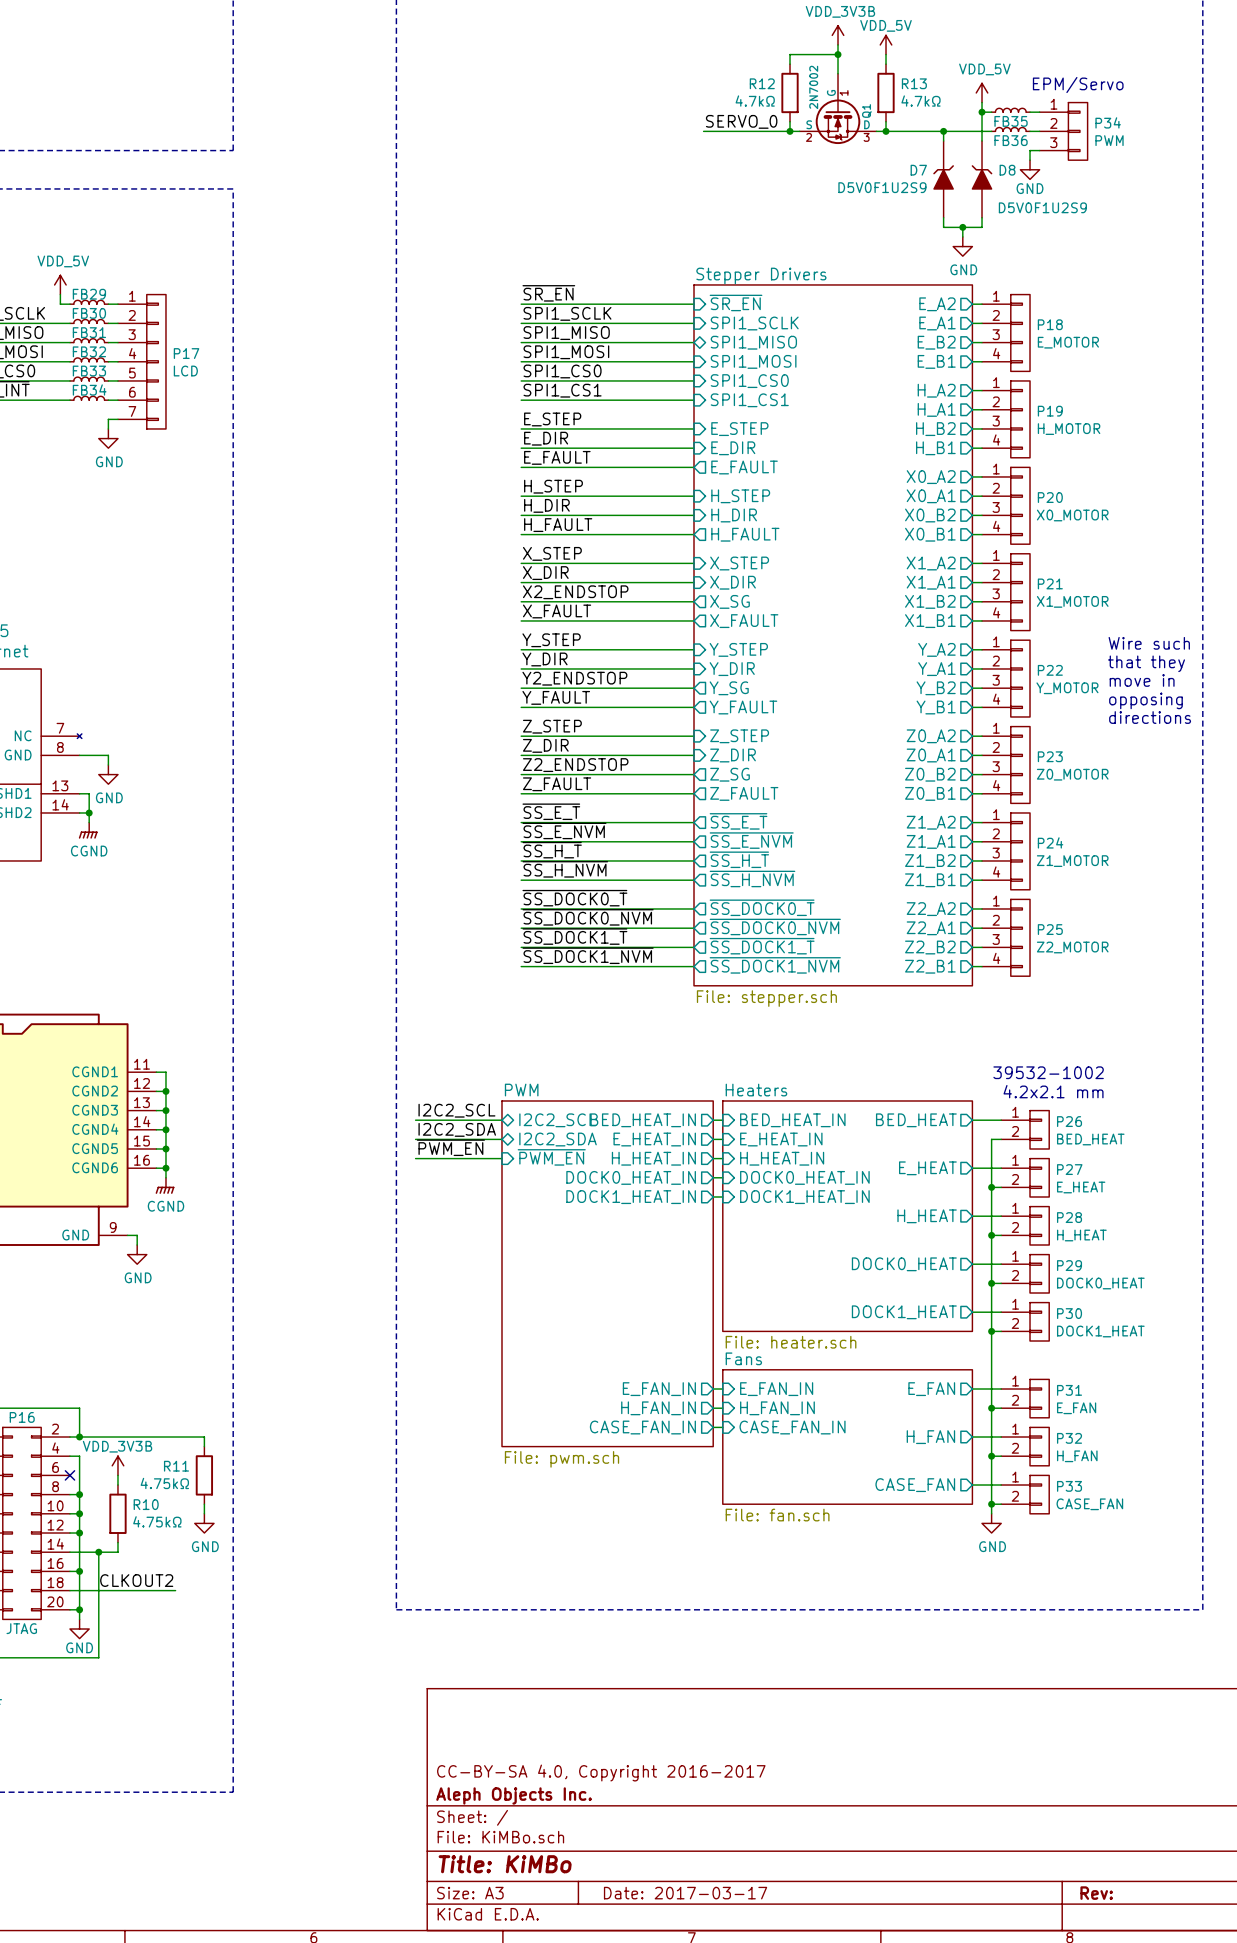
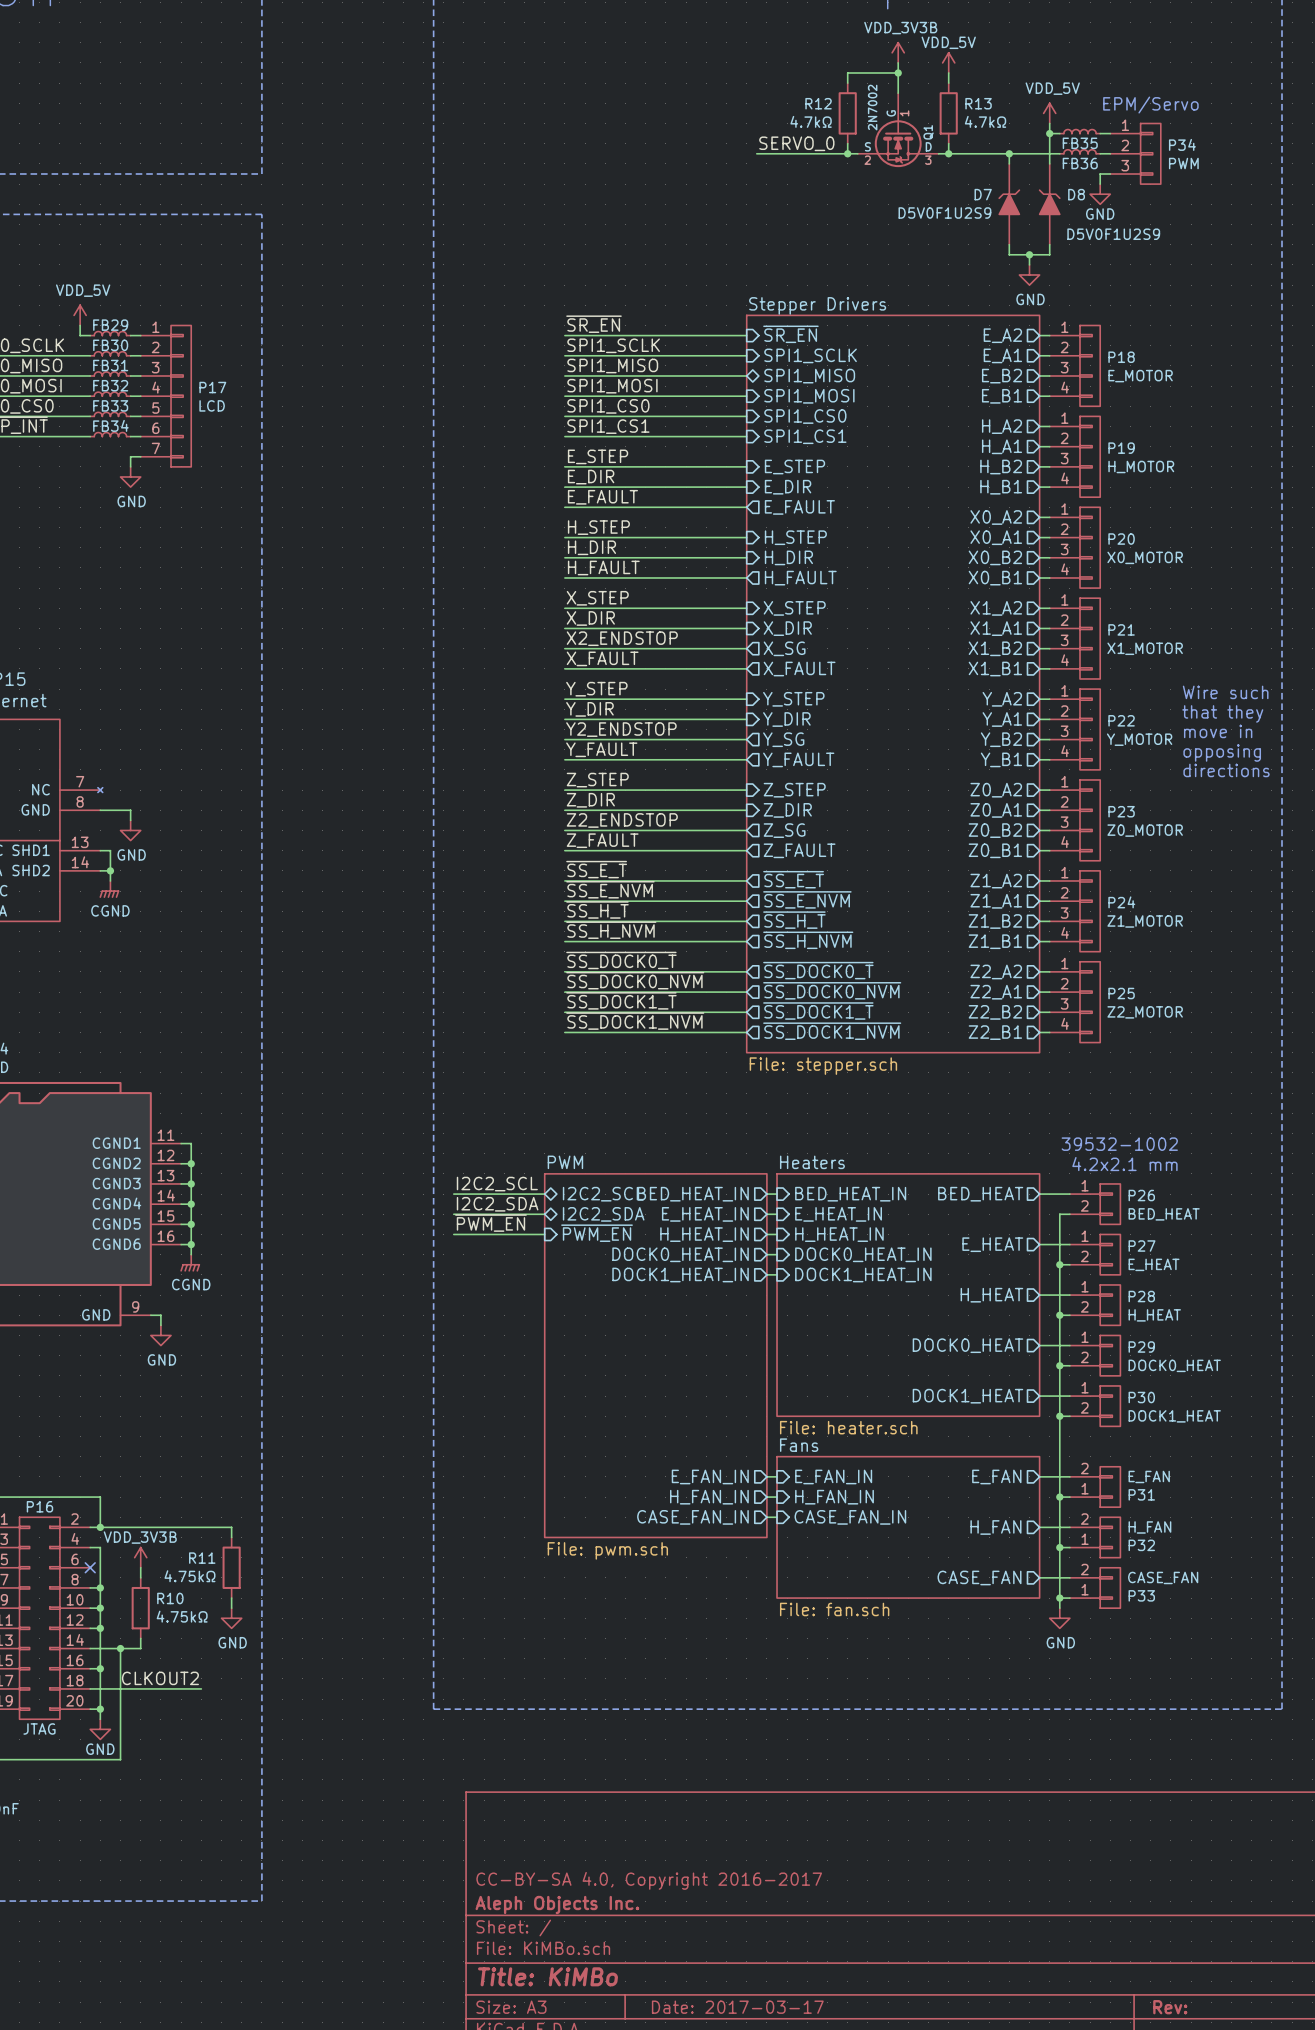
P31 flip: as is (1039, 1398) -> up-down (1110, 1486)
P32 flip: as is (1039, 1446) -> up-down (1110, 1537)
P33 flip: as is (1039, 1494) -> up-down (1110, 1587)

